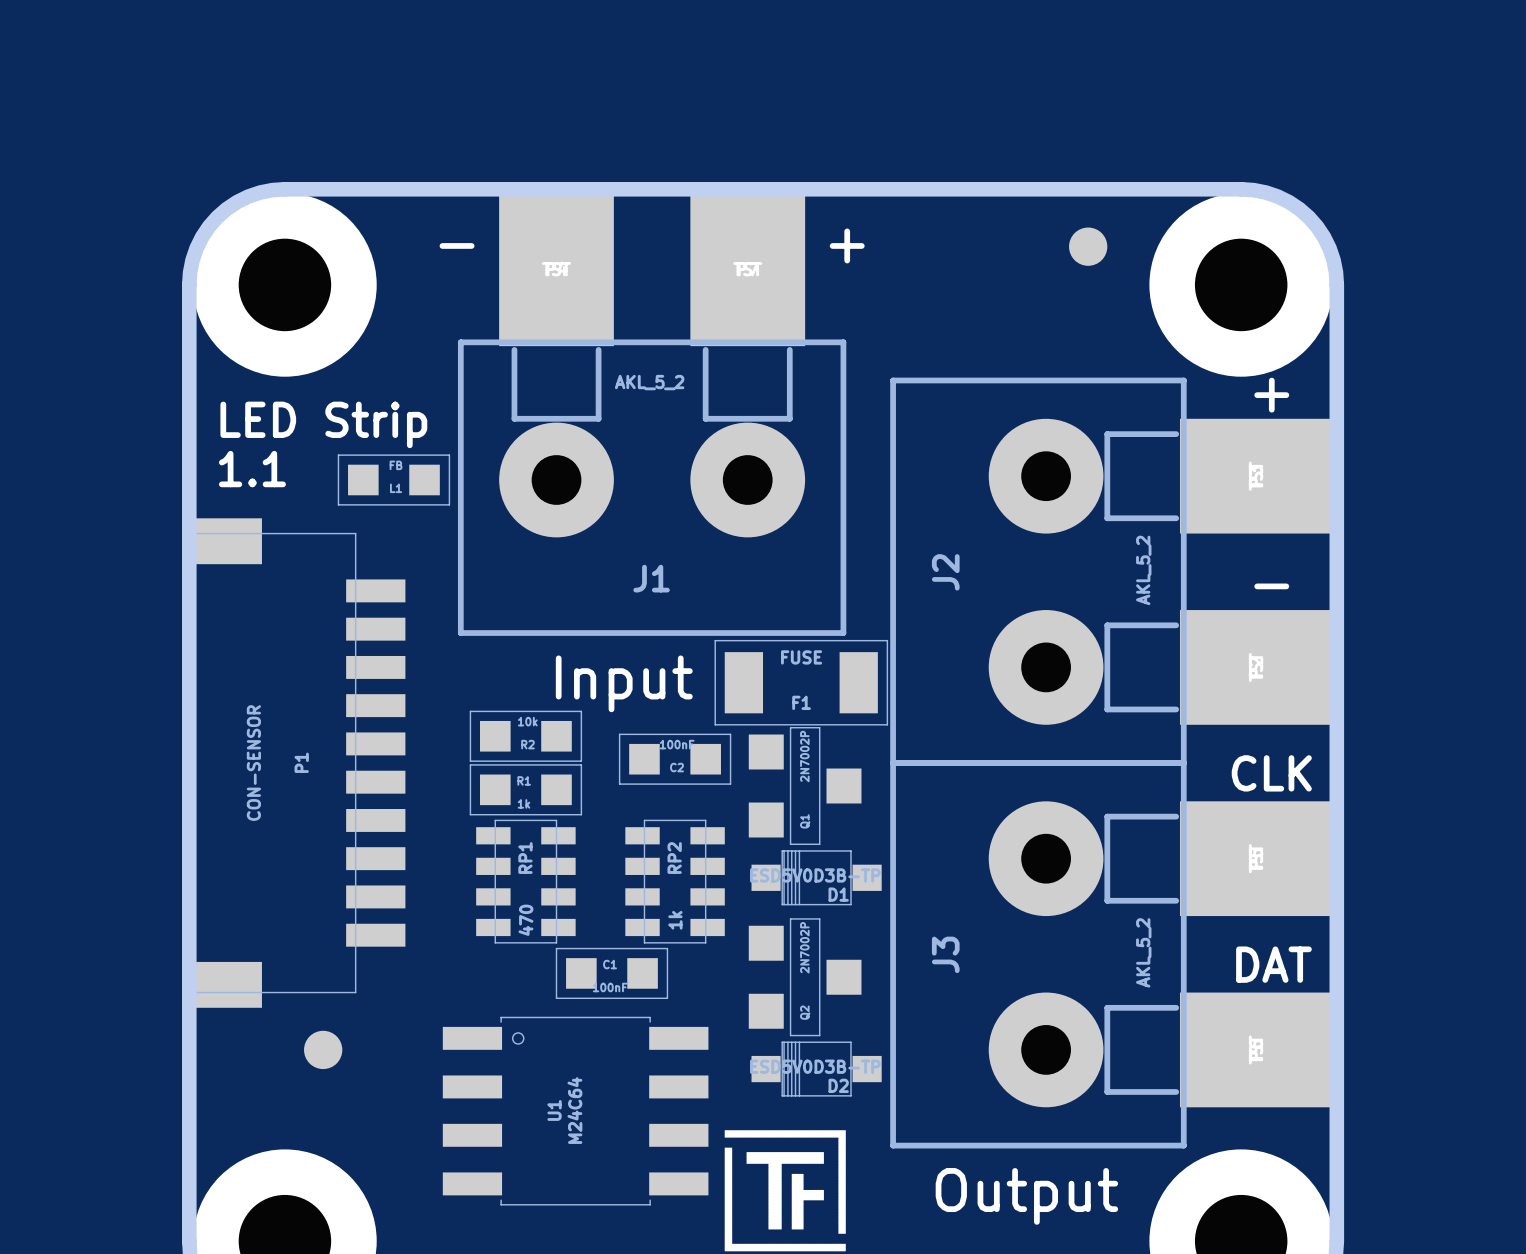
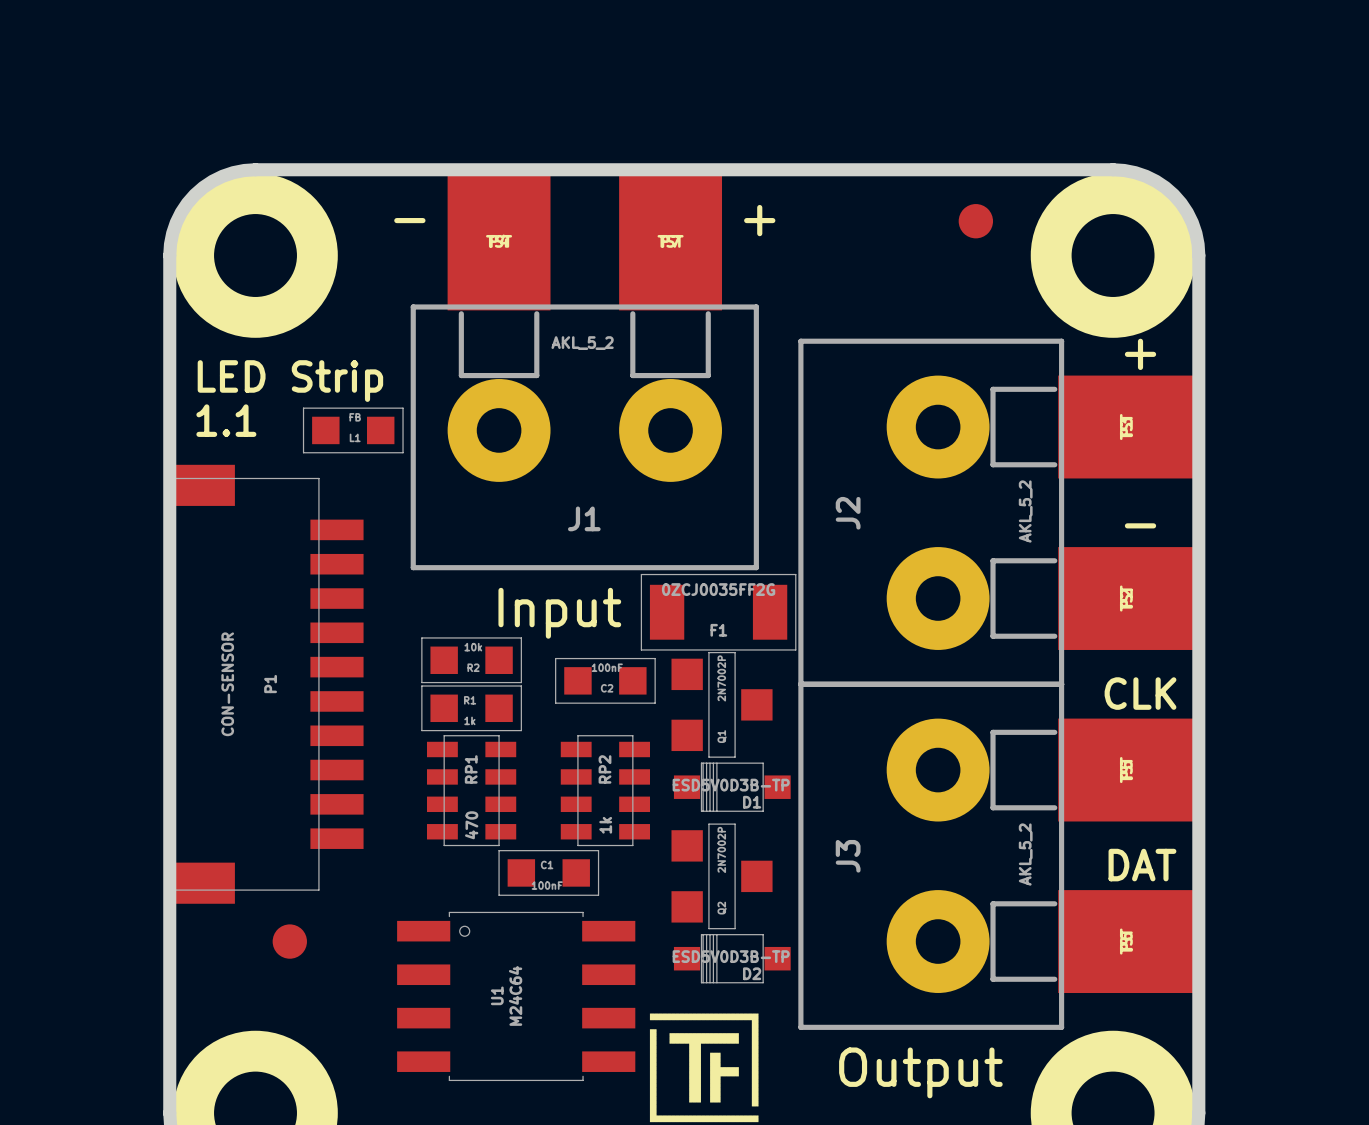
F1 value: FUSE (801, 657) -> 0ZCJ0035FF2G (718, 589)

